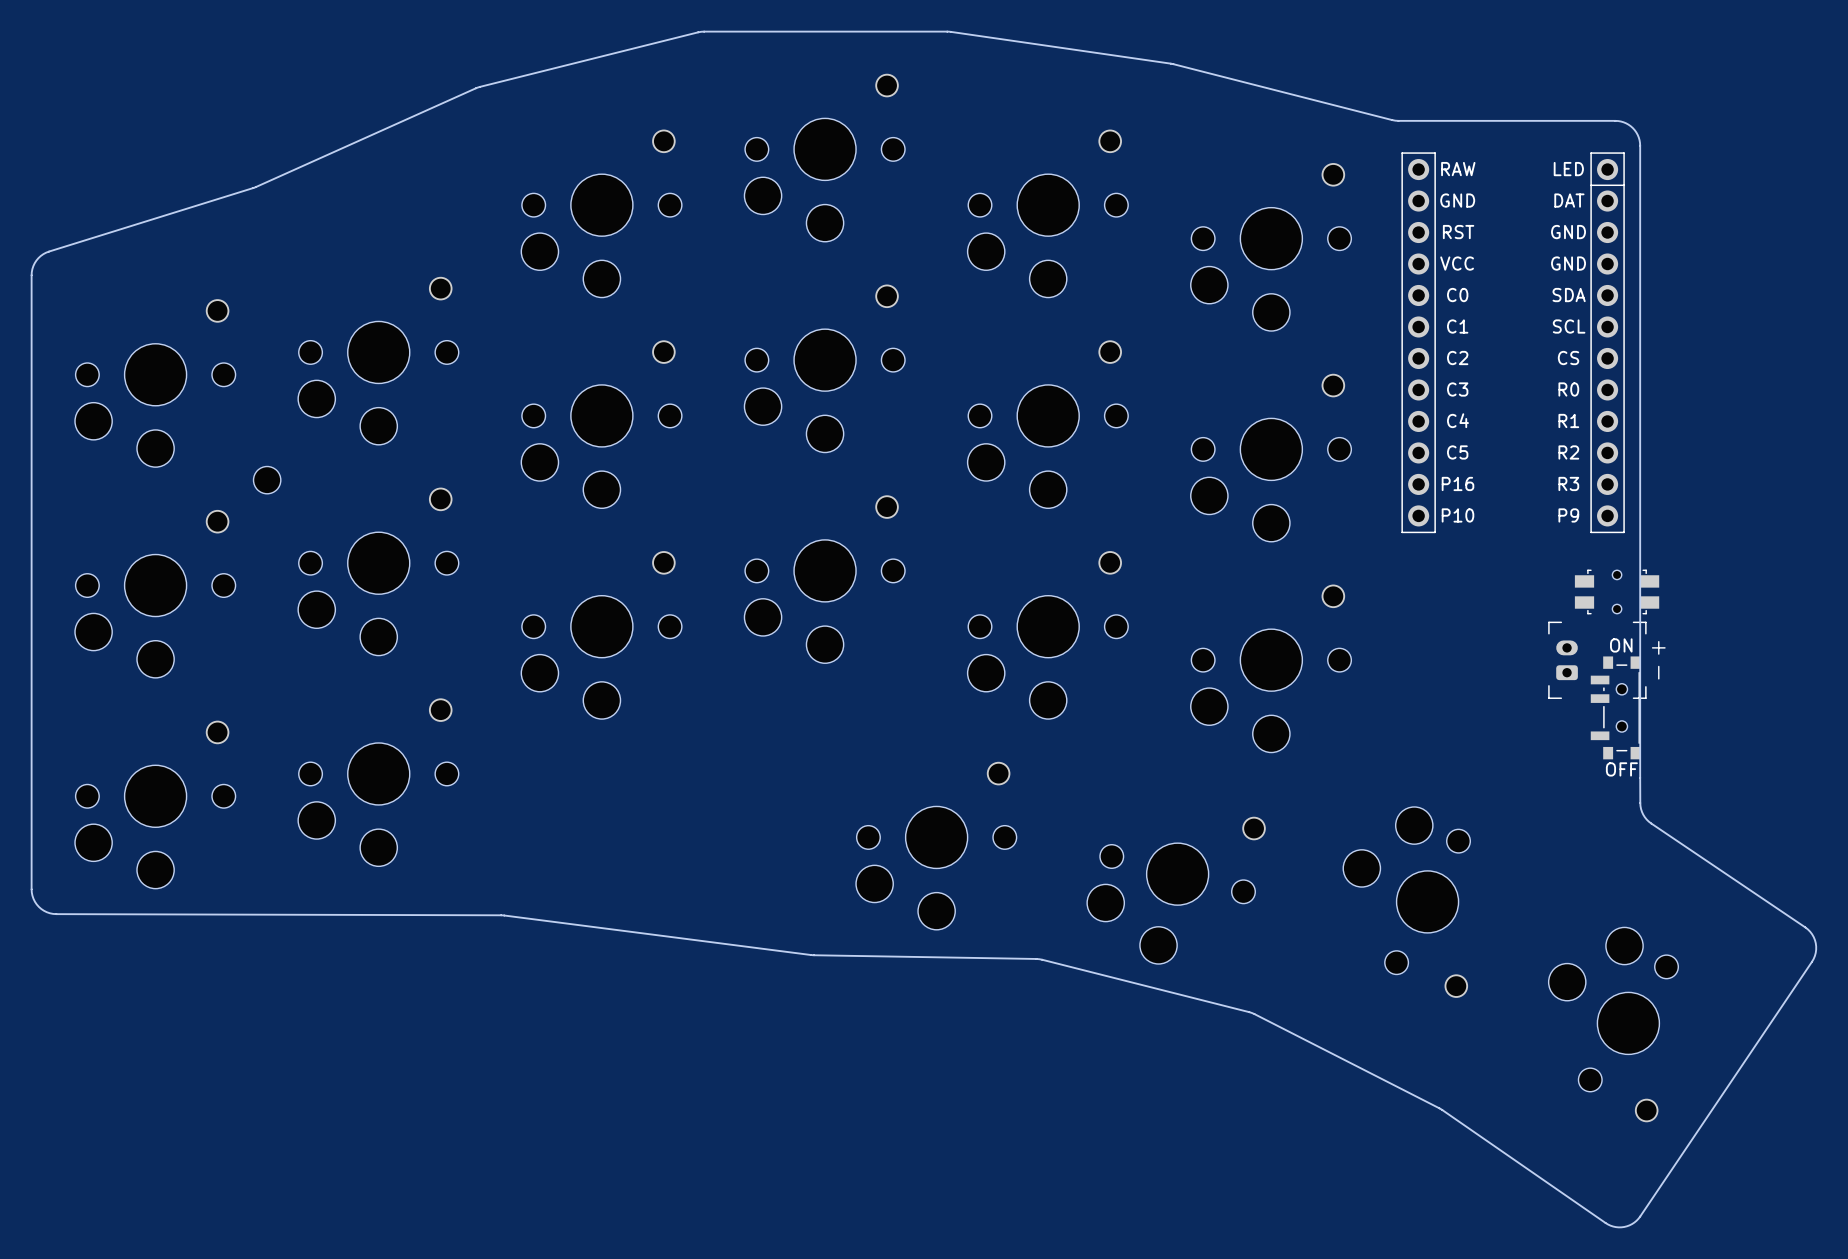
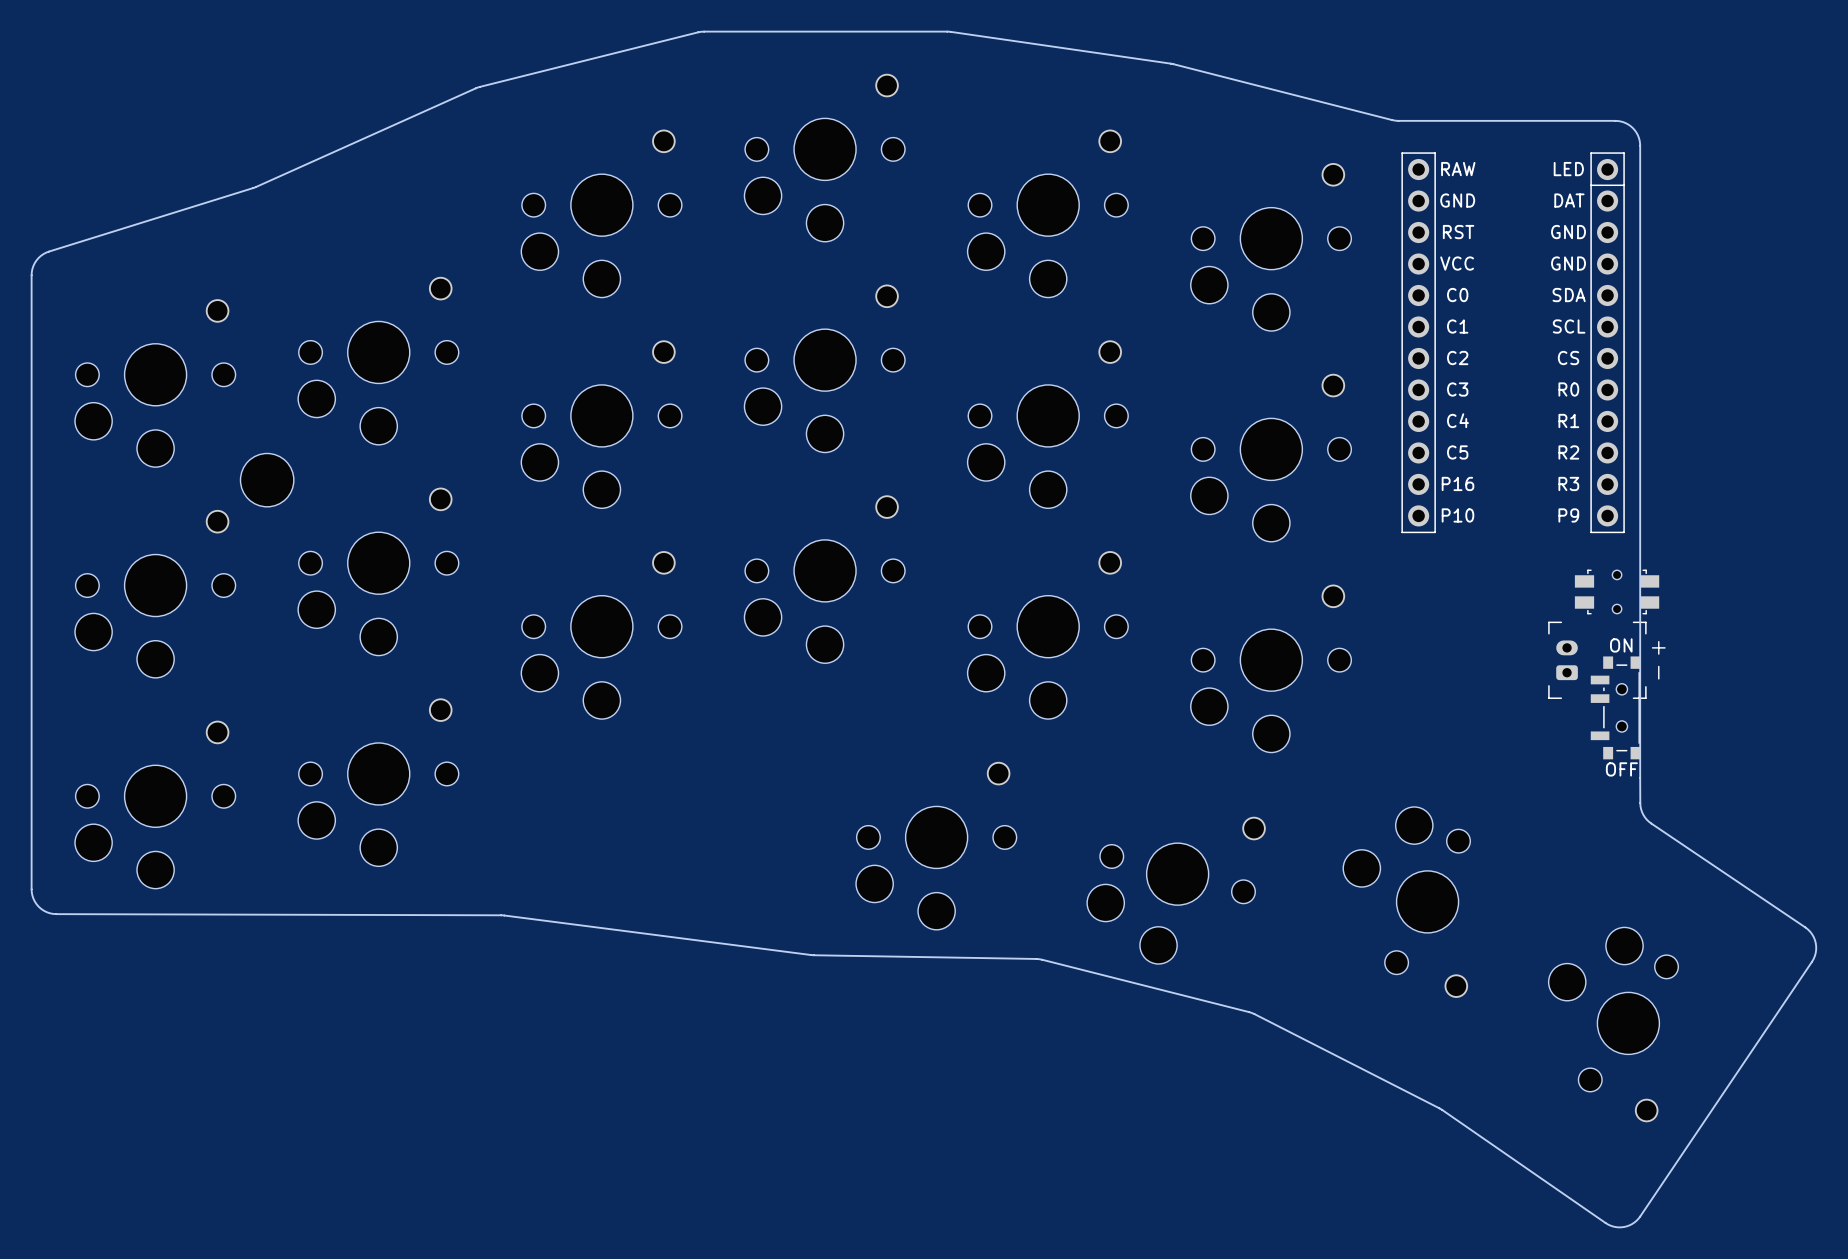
part footprint: [253, 466, 281, 494] -> [240, 453, 294, 507]

